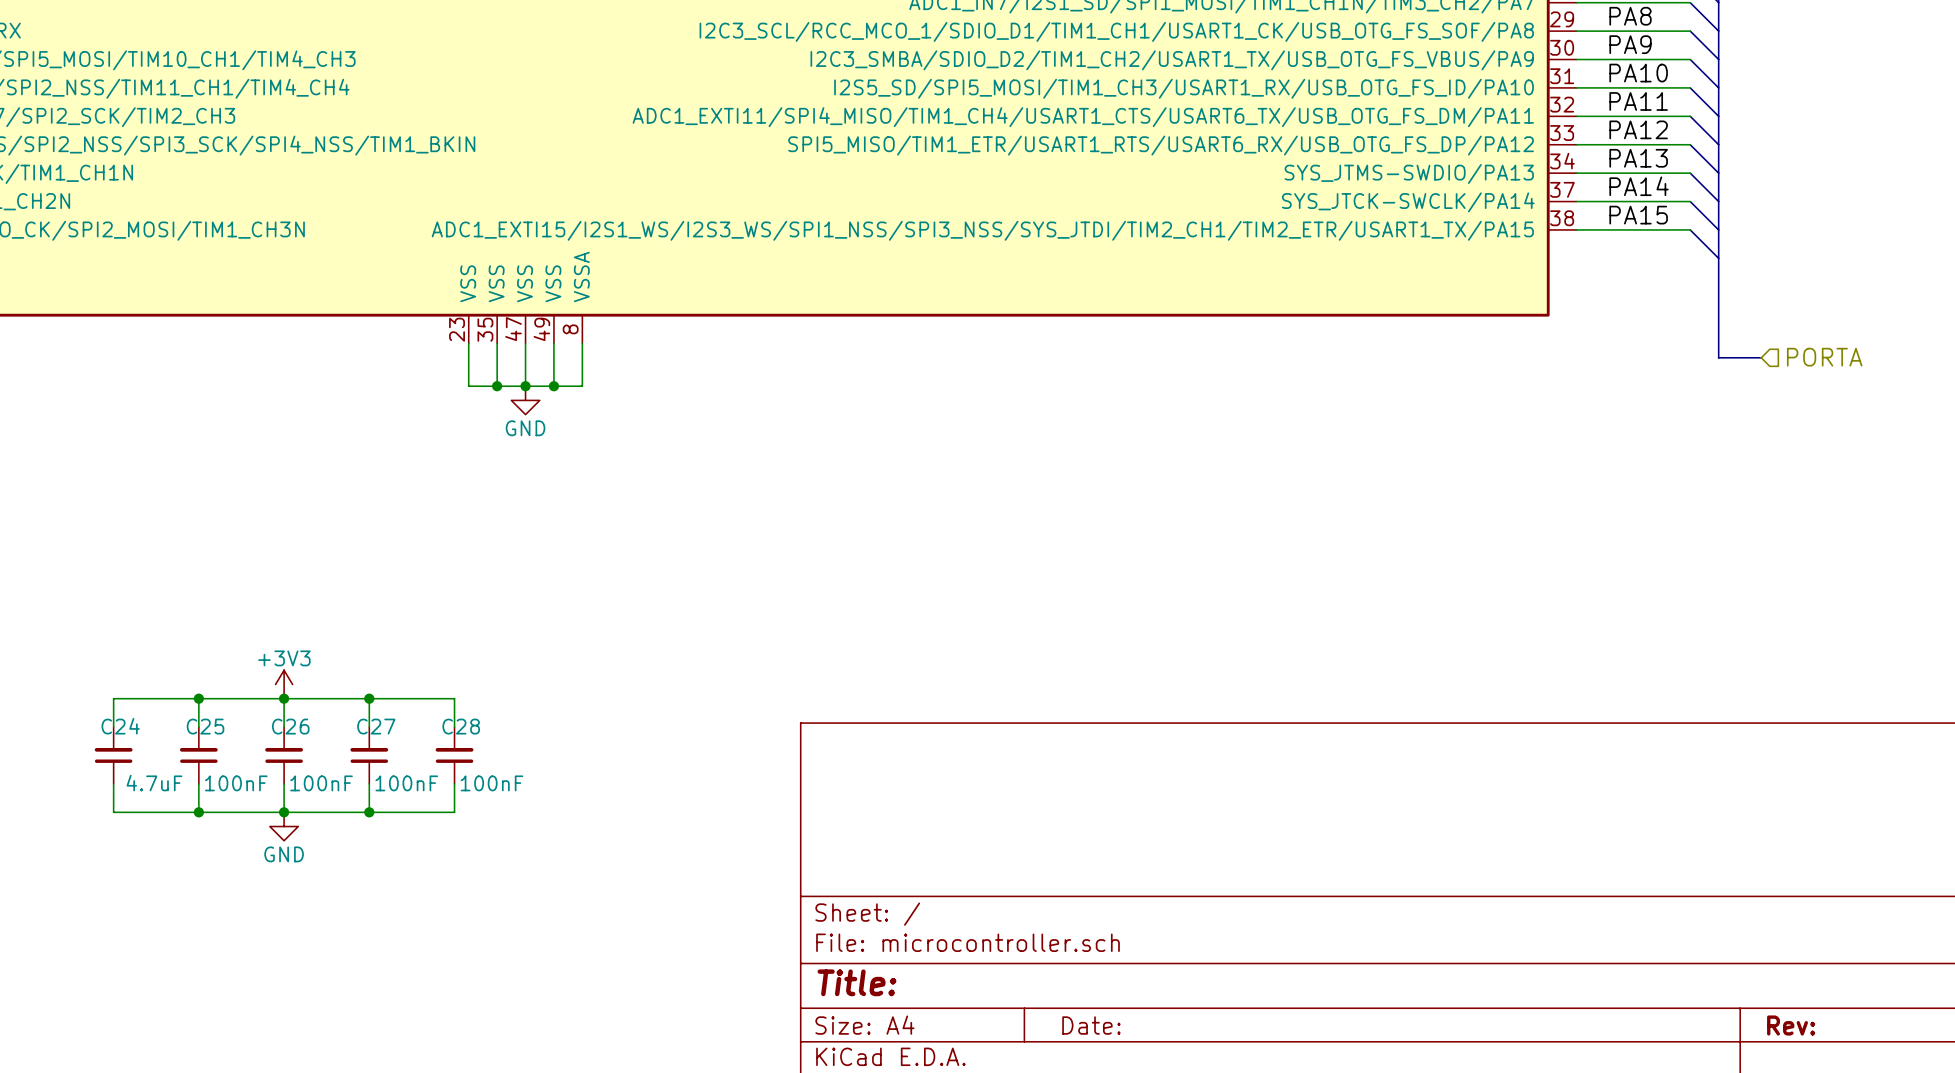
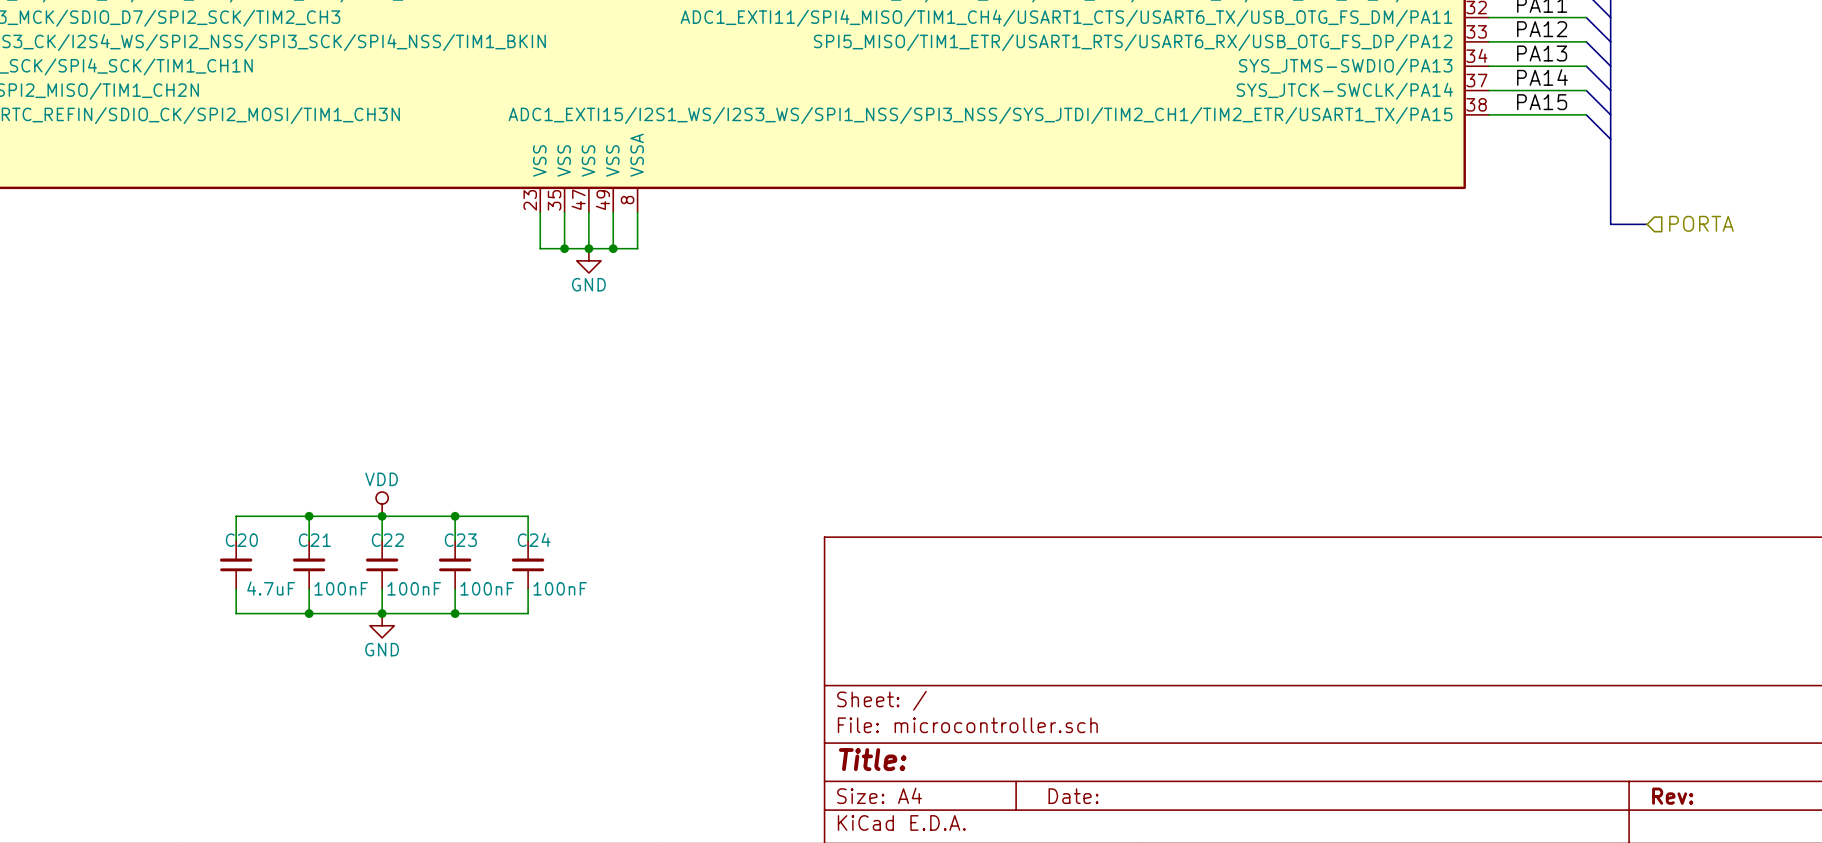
power symbol: +3V3 (284, 684) -> VDD (382, 504)
C24 name: C24 (120, 726) -> C20 (241, 540)
C25 name: C25 (205, 726) -> C21 (314, 540)
C26 name: C26 (290, 726) -> C22 (387, 540)
C27 name: C27 (376, 726) -> C23 (460, 540)
C28 name: C28 (461, 726) -> C24 (534, 539)

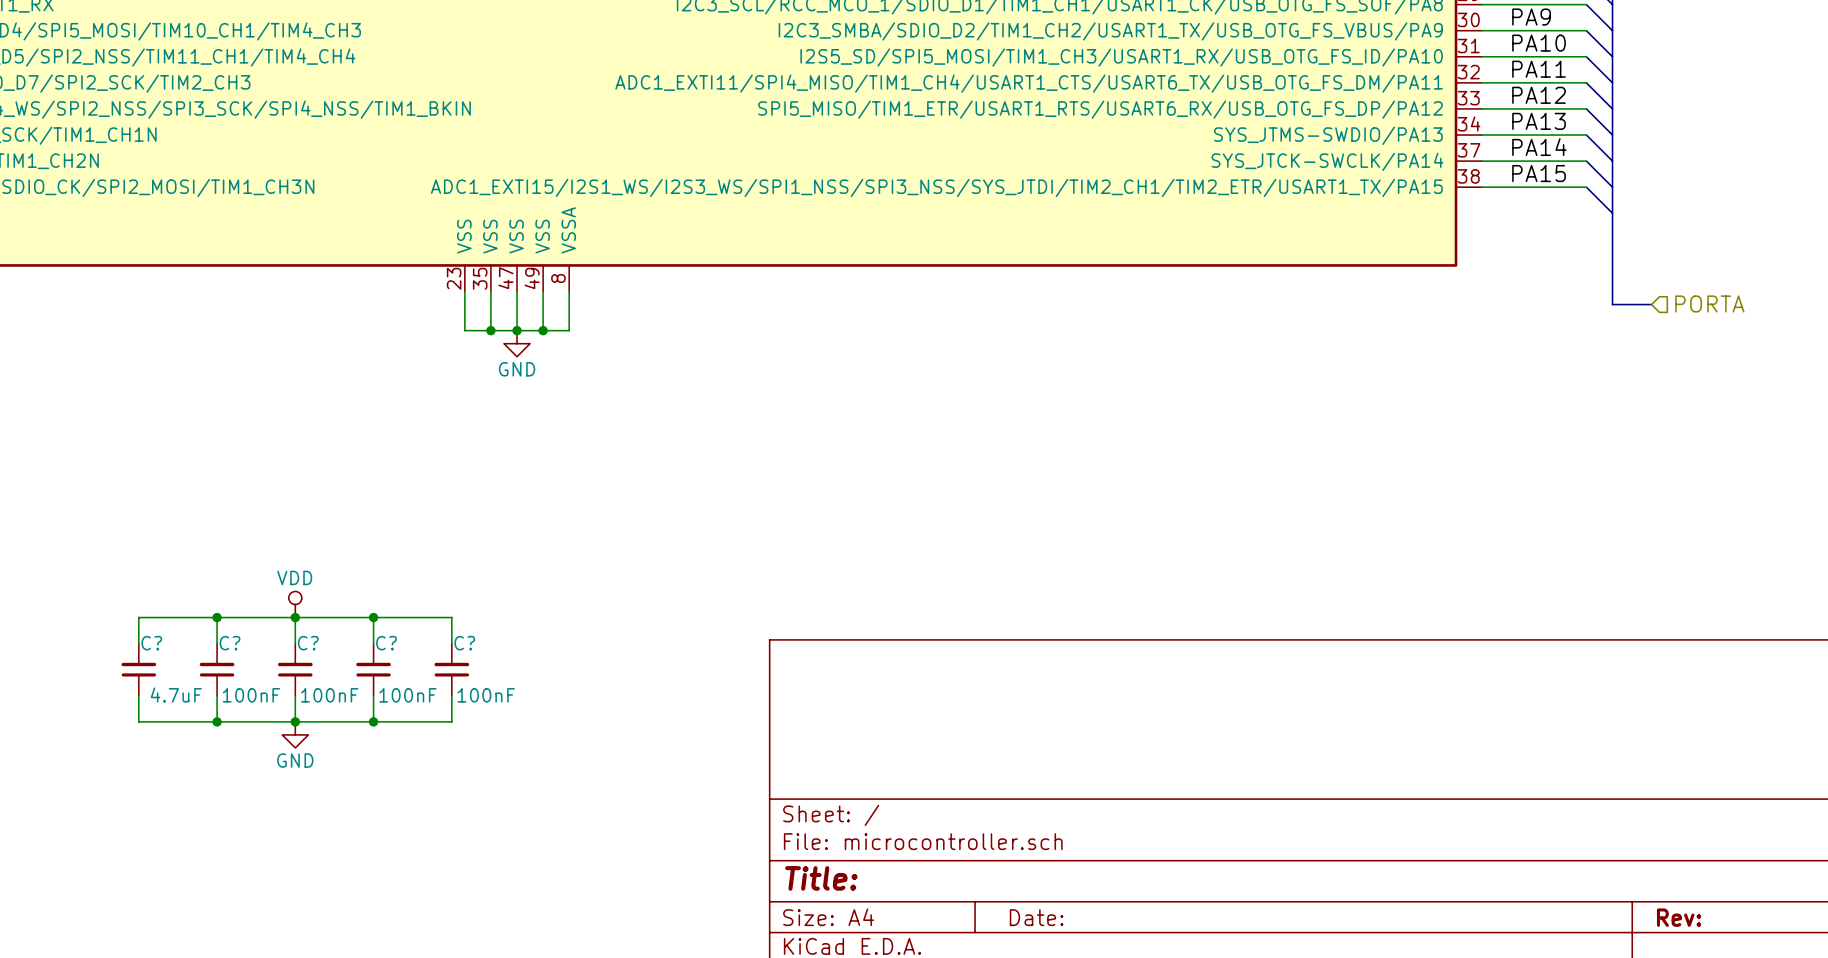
C24 name: C24 (534, 539) -> C? (464, 643)
C20 name: C20 (241, 540) -> C? (151, 643)
C21 name: C21 (314, 540) -> C? (230, 643)
C22 name: C22 (387, 540) -> C? (308, 643)
C23 name: C23 (460, 540) -> C? (386, 643)

